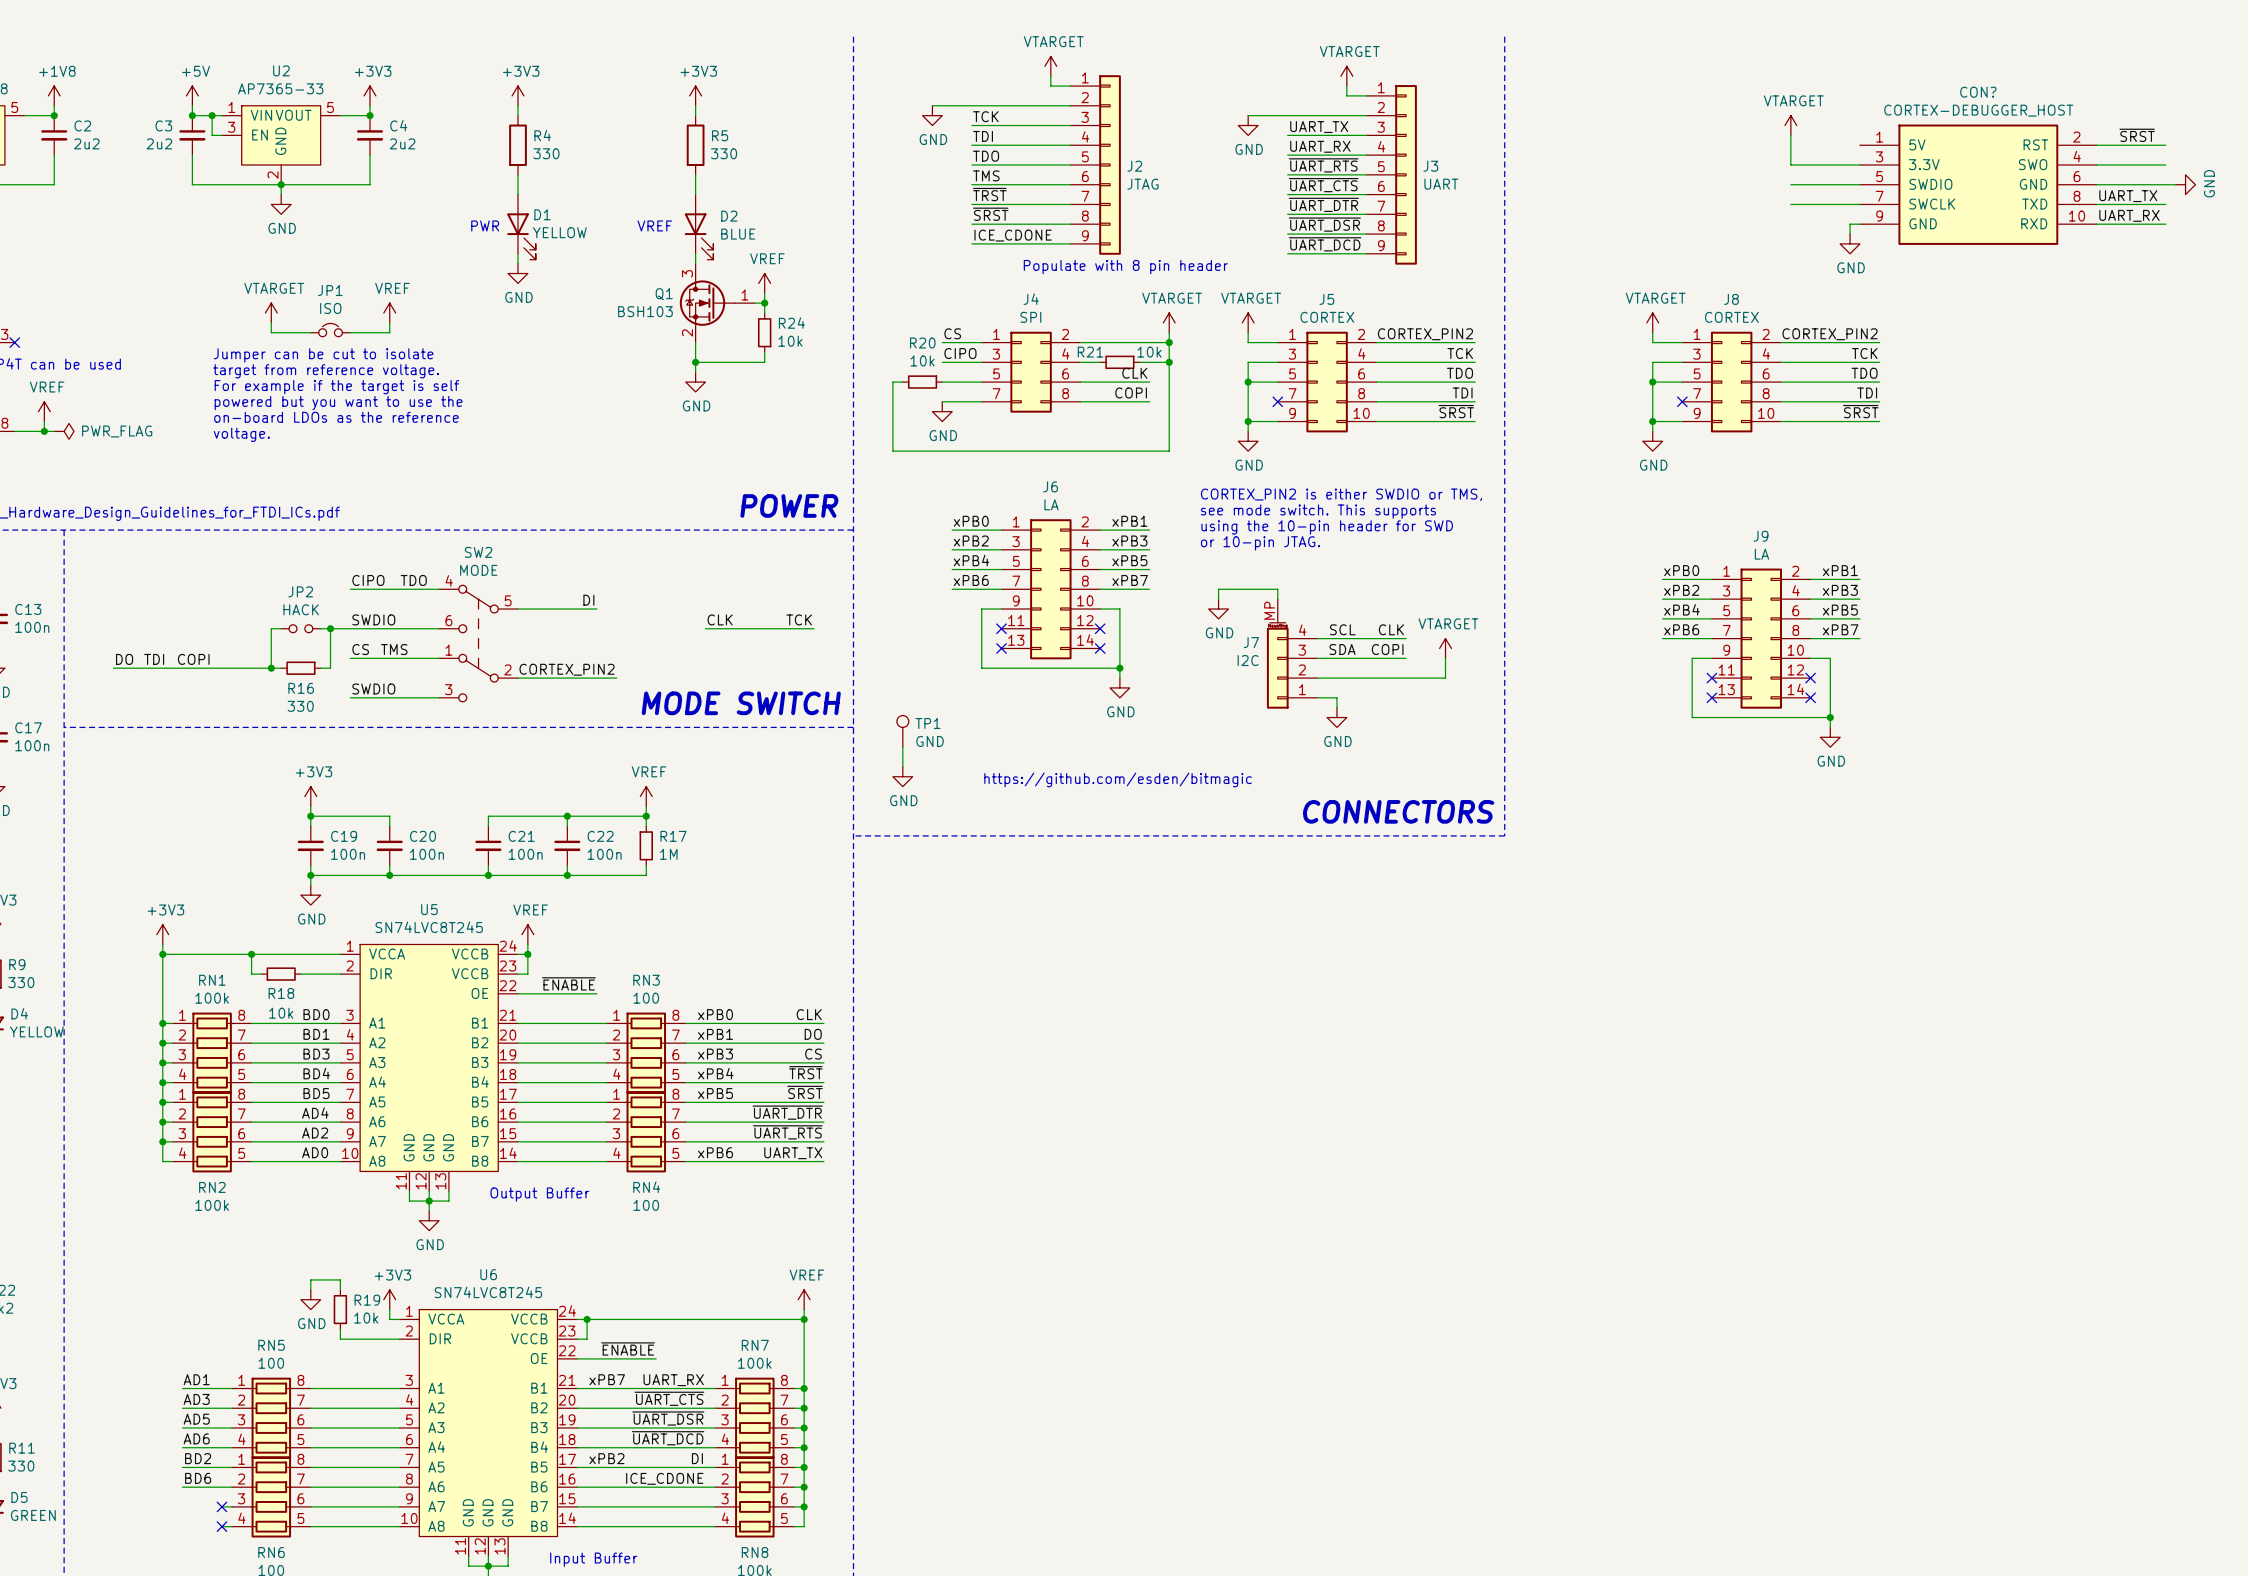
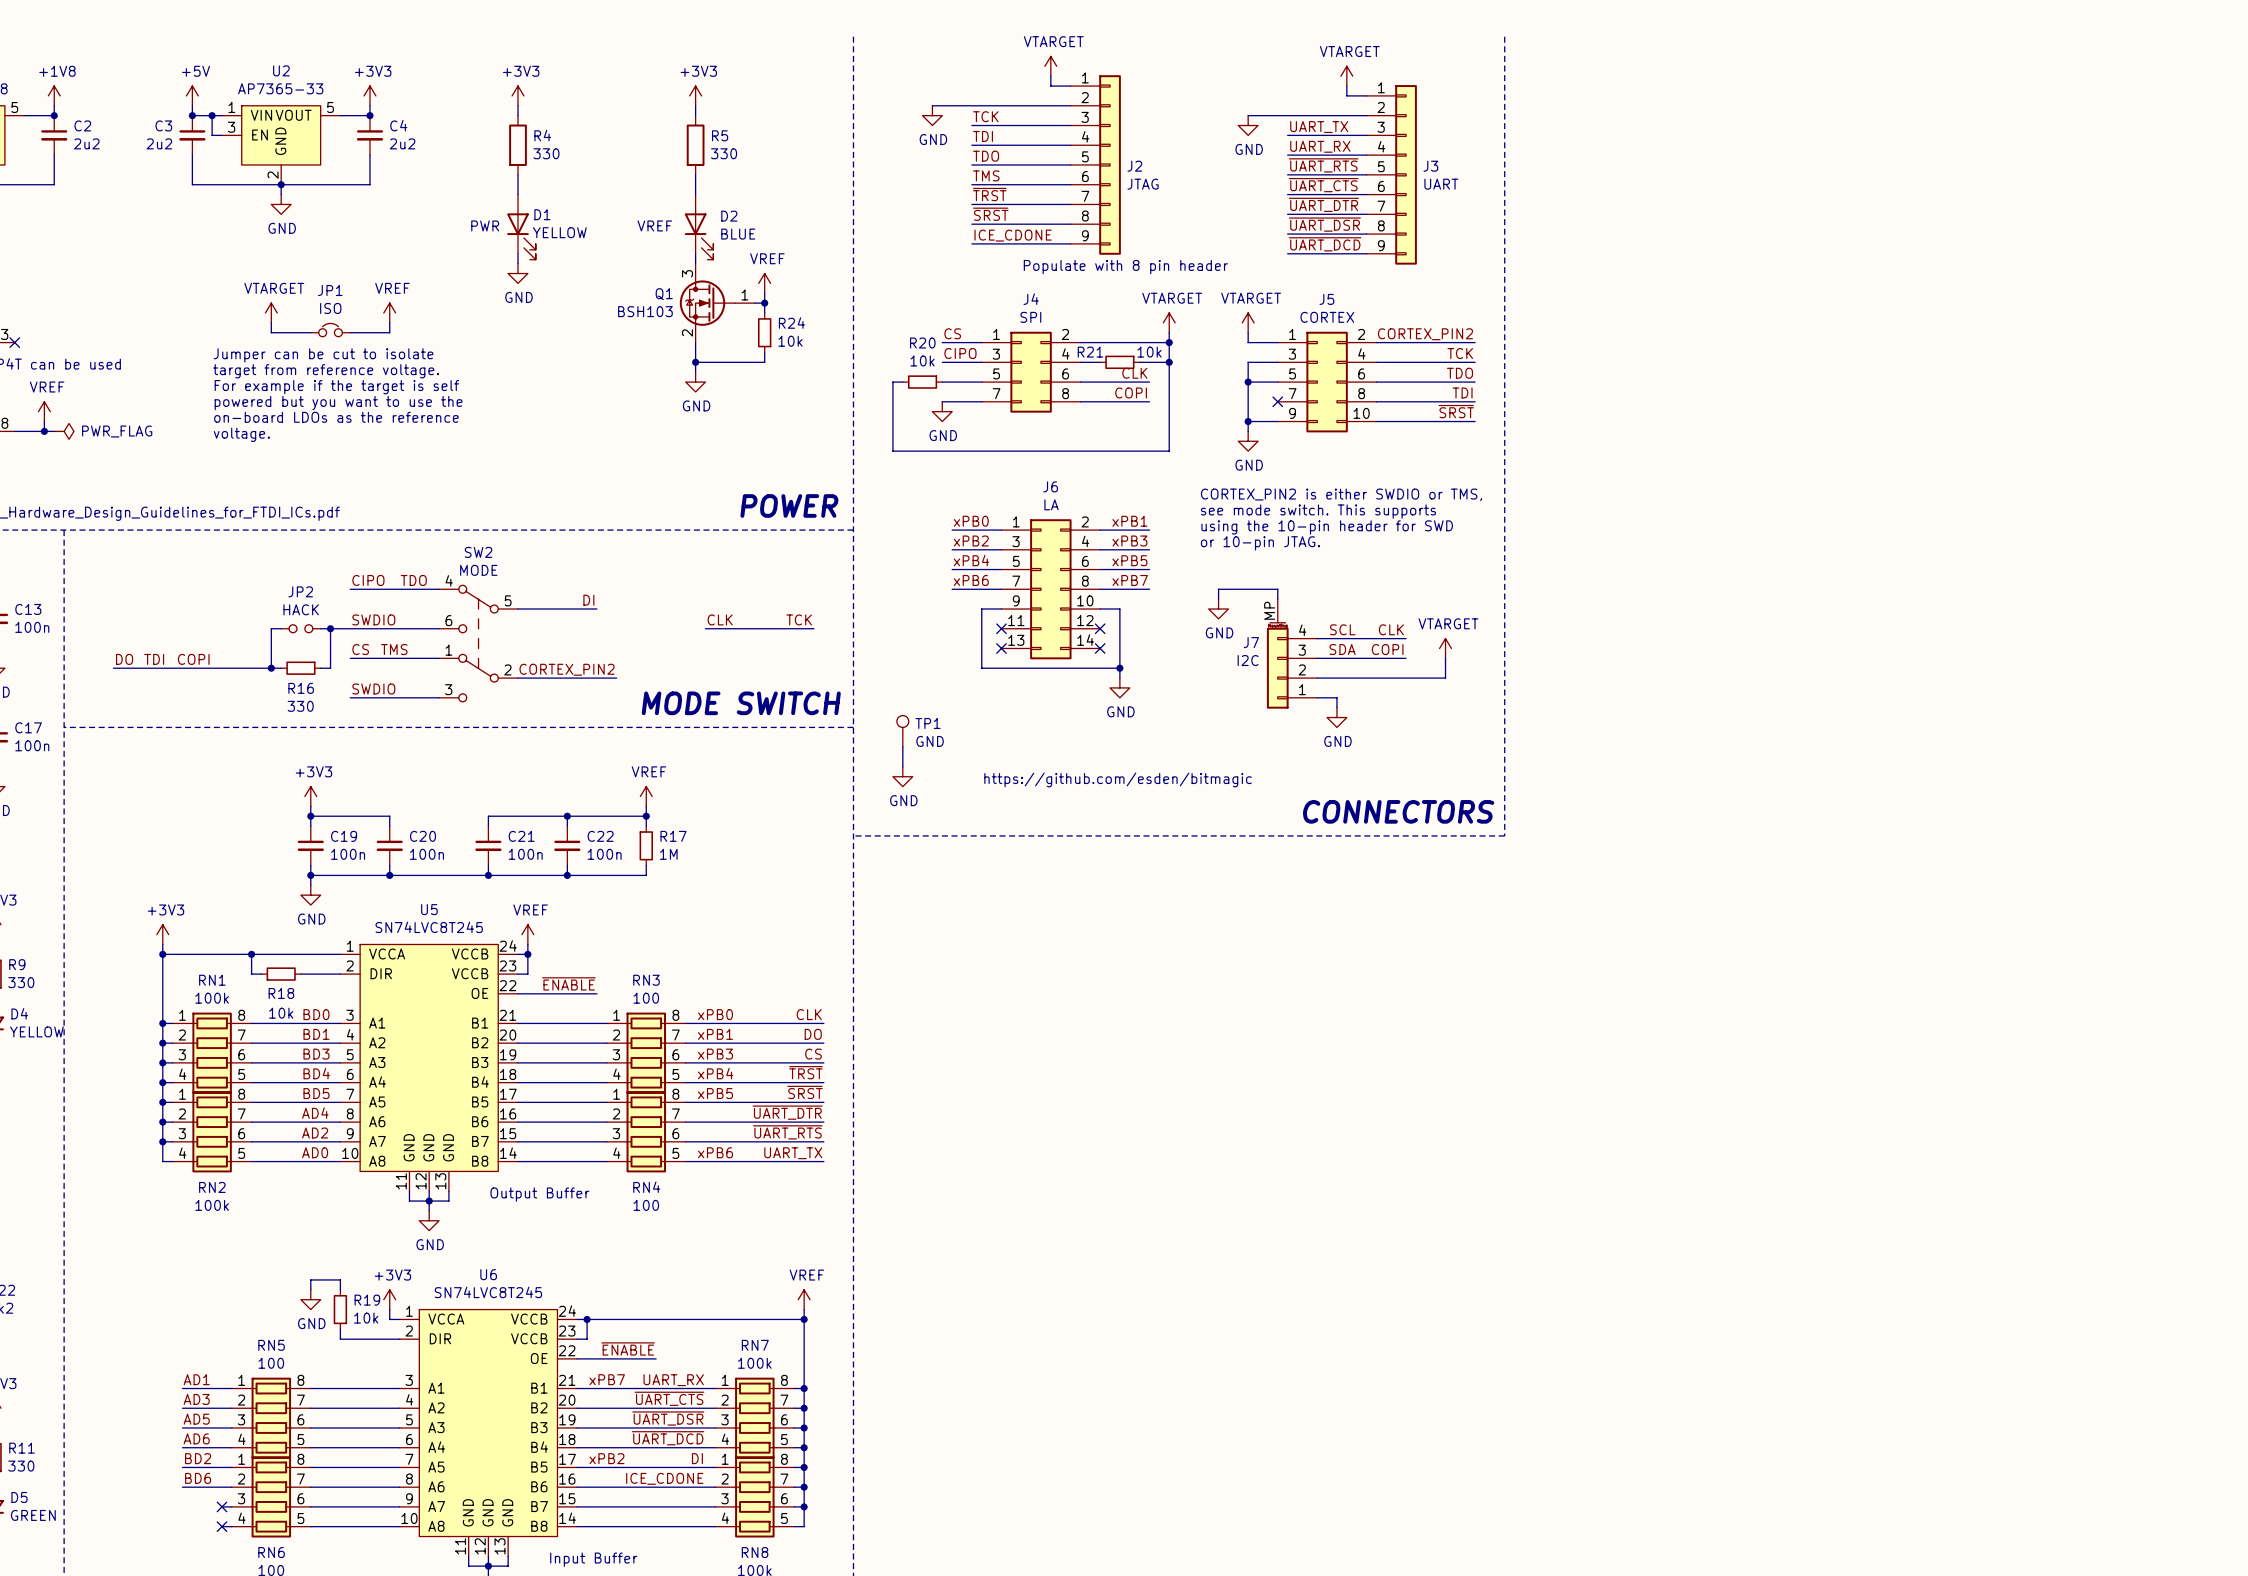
power symbol: VTARGET (1790, 125) -> none
wire: (1790, 135) (1790, 164) (1859, 164) -> none
label: ~{SRST} (2137, 135) -> none
wire: (2096, 145) (2165, 145) -> none
wire: (2096, 164) (2165, 164) -> none
wire: (1790, 184) (1859, 184) -> none
CON?: CORTEX-DEBUGGER_HOST (1978, 184) -> none
wire: (2096, 184) (2175, 184) -> none
power symbol: GND (2185, 184) -> none
label: UART_TX (2128, 196) -> none
wire: (1790, 204) (1859, 204) -> none
wire: (2096, 204) (2165, 204) -> none
label: UART_RX (2129, 215) -> none
wire: (1859, 224) (1850, 224) (1850, 234) -> none
wire: (2096, 224) (2165, 224) -> none
power symbol: GND (1850, 243) -> none
power symbol: VTARGET (1652, 322) -> none
wire: (1652, 332) (1652, 342) (1682, 342) -> none
label: CORTEX_PIN2 (1830, 334) -> none
wire: (1781, 342) (1879, 342) -> none
label: TCK (1864, 353) -> none
wire: (1682, 362) (1652, 362) (1652, 431) -> none
wire: (1781, 362) (1879, 362) -> none
label: TDO (1864, 373) -> none
wire: (1652, 382) (1682, 382) -> none
junction: (1652, 382) -> none
J8: CORTEX (1731, 382) -> none
wire: (1781, 382) (1879, 382) -> none
label: TDI (1867, 392) -> none
no-connect mark: (1682, 401) -> none
wire: (1781, 401) (1879, 401) -> none
label: ~{SRST} (1860, 411) -> none
wire: (1652, 421) (1682, 421) -> none
junction: (1652, 421) -> none
wire: (1781, 421) (1879, 421) -> none
power symbol: GND (1652, 441) -> none
label: xPB0 (1681, 570) -> none
label: xPB1 (1840, 570) -> none
wire: (1662, 579) (1711, 579) -> none
wire: (1810, 579) (1859, 579) -> none
label: xPB2 (1681, 590) -> none
label: xPB3 (1840, 590) -> none
wire: (1662, 599) (1711, 599) -> none
wire: (1810, 599) (1859, 599) -> none
label: xPB4 (1681, 609) -> none
label: xPB5 (1840, 610) -> none
wire: (1662, 618) (1711, 618) -> none
wire: (1810, 618) (1859, 618) -> none
label: xPB6 (1681, 629) -> none
label: xPB7 (1840, 629) -> none
wire: (1662, 638) (1711, 638) -> none
J9: LA (1761, 638) -> none
wire: (1810, 638) (1859, 638) -> none
wire: (1711, 658) (1692, 658) (1692, 717) (1830, 717) -> none
wire: (1810, 658) (1830, 658) (1830, 727) -> none
no-connect mark: (1711, 678) -> none
no-connect mark: (1810, 678) -> none
no-connect mark: (1711, 697) -> none
no-connect mark: (1810, 697) -> none
junction: (1830, 717) -> none
power symbol: GND (1830, 737) -> none

